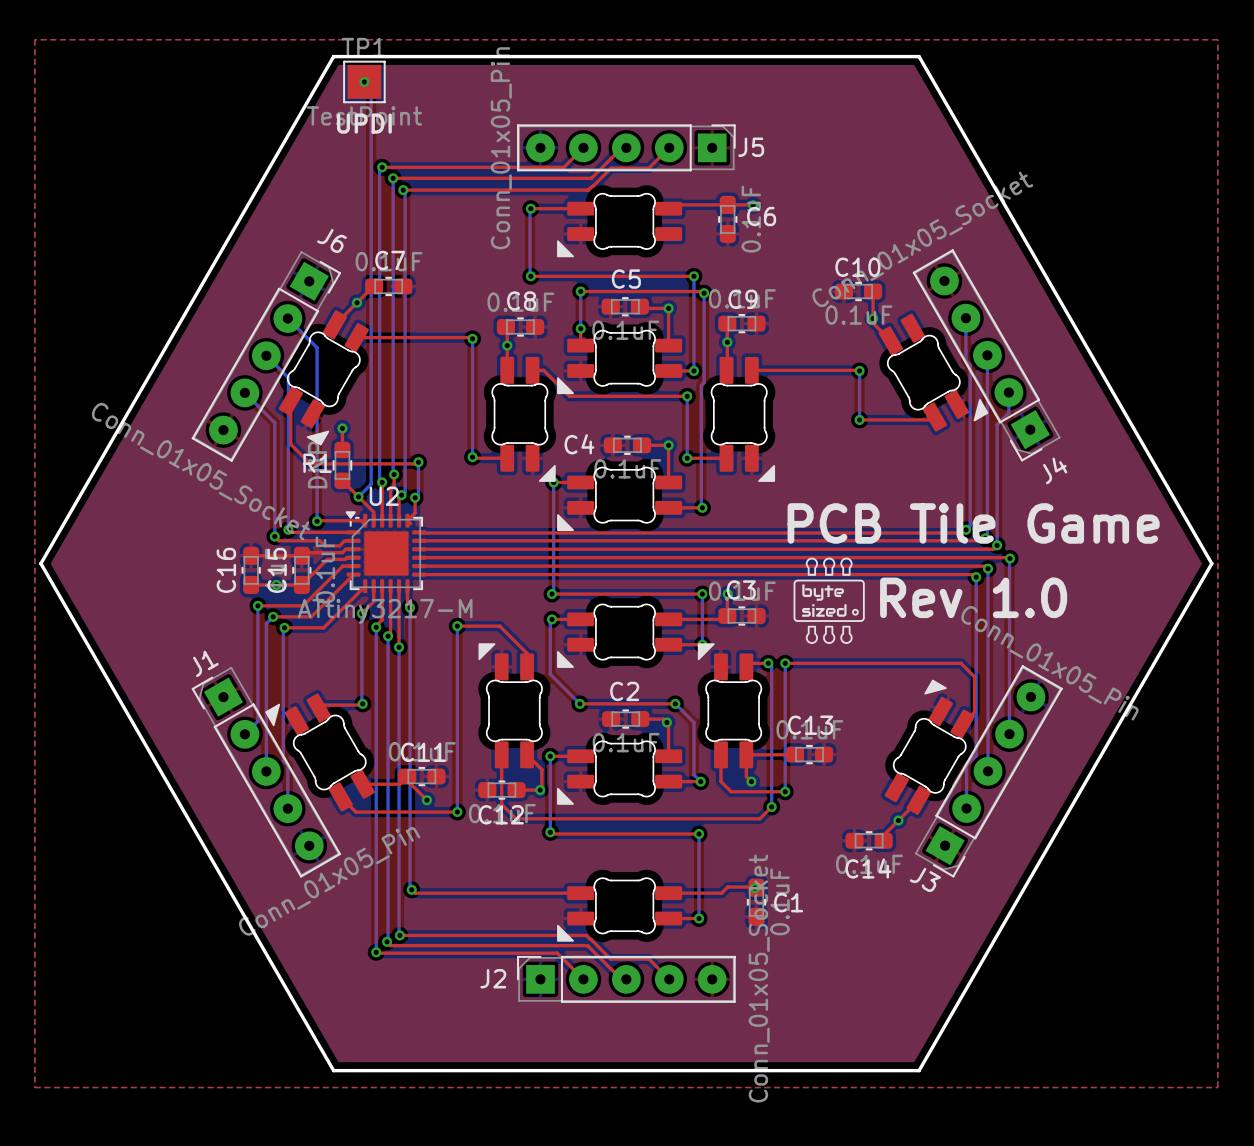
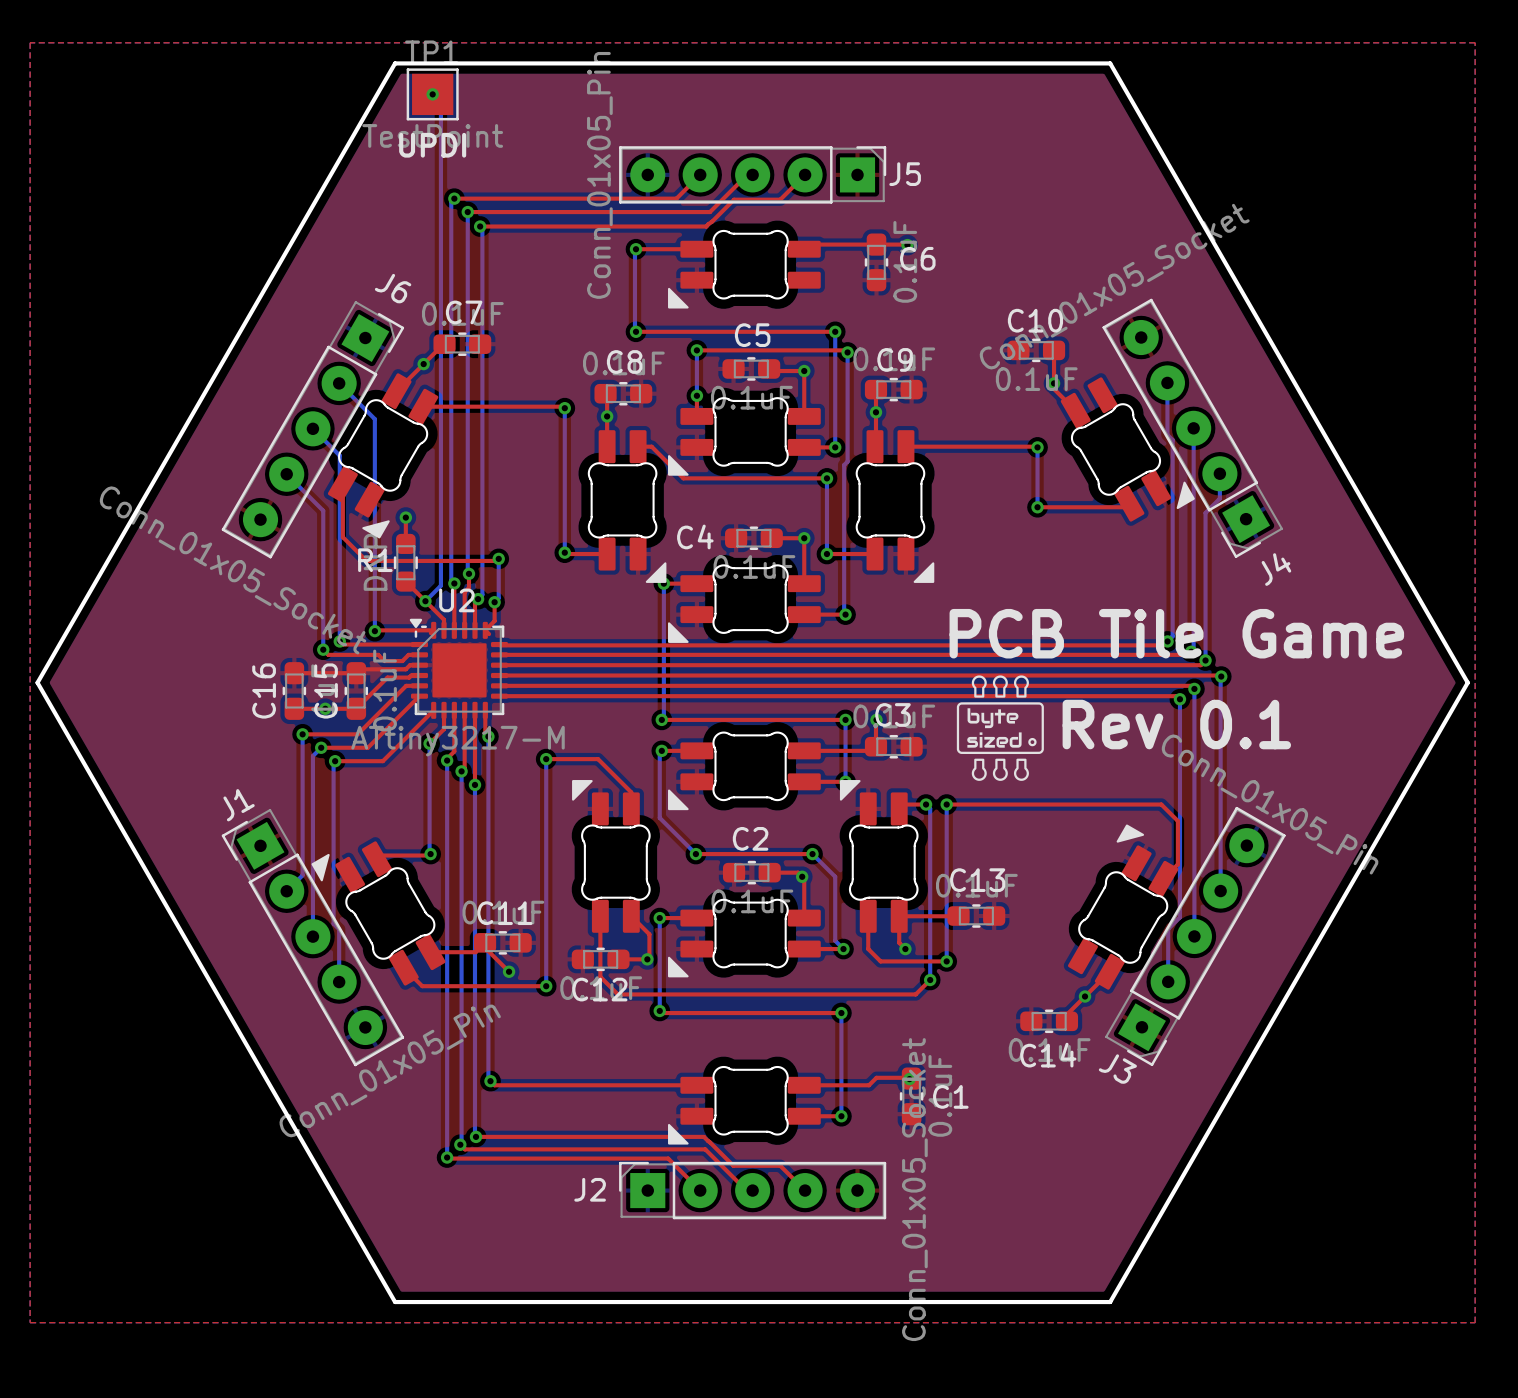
text: Rev 1.0 (973, 597) -> Rev 0.1 (1176, 724)

